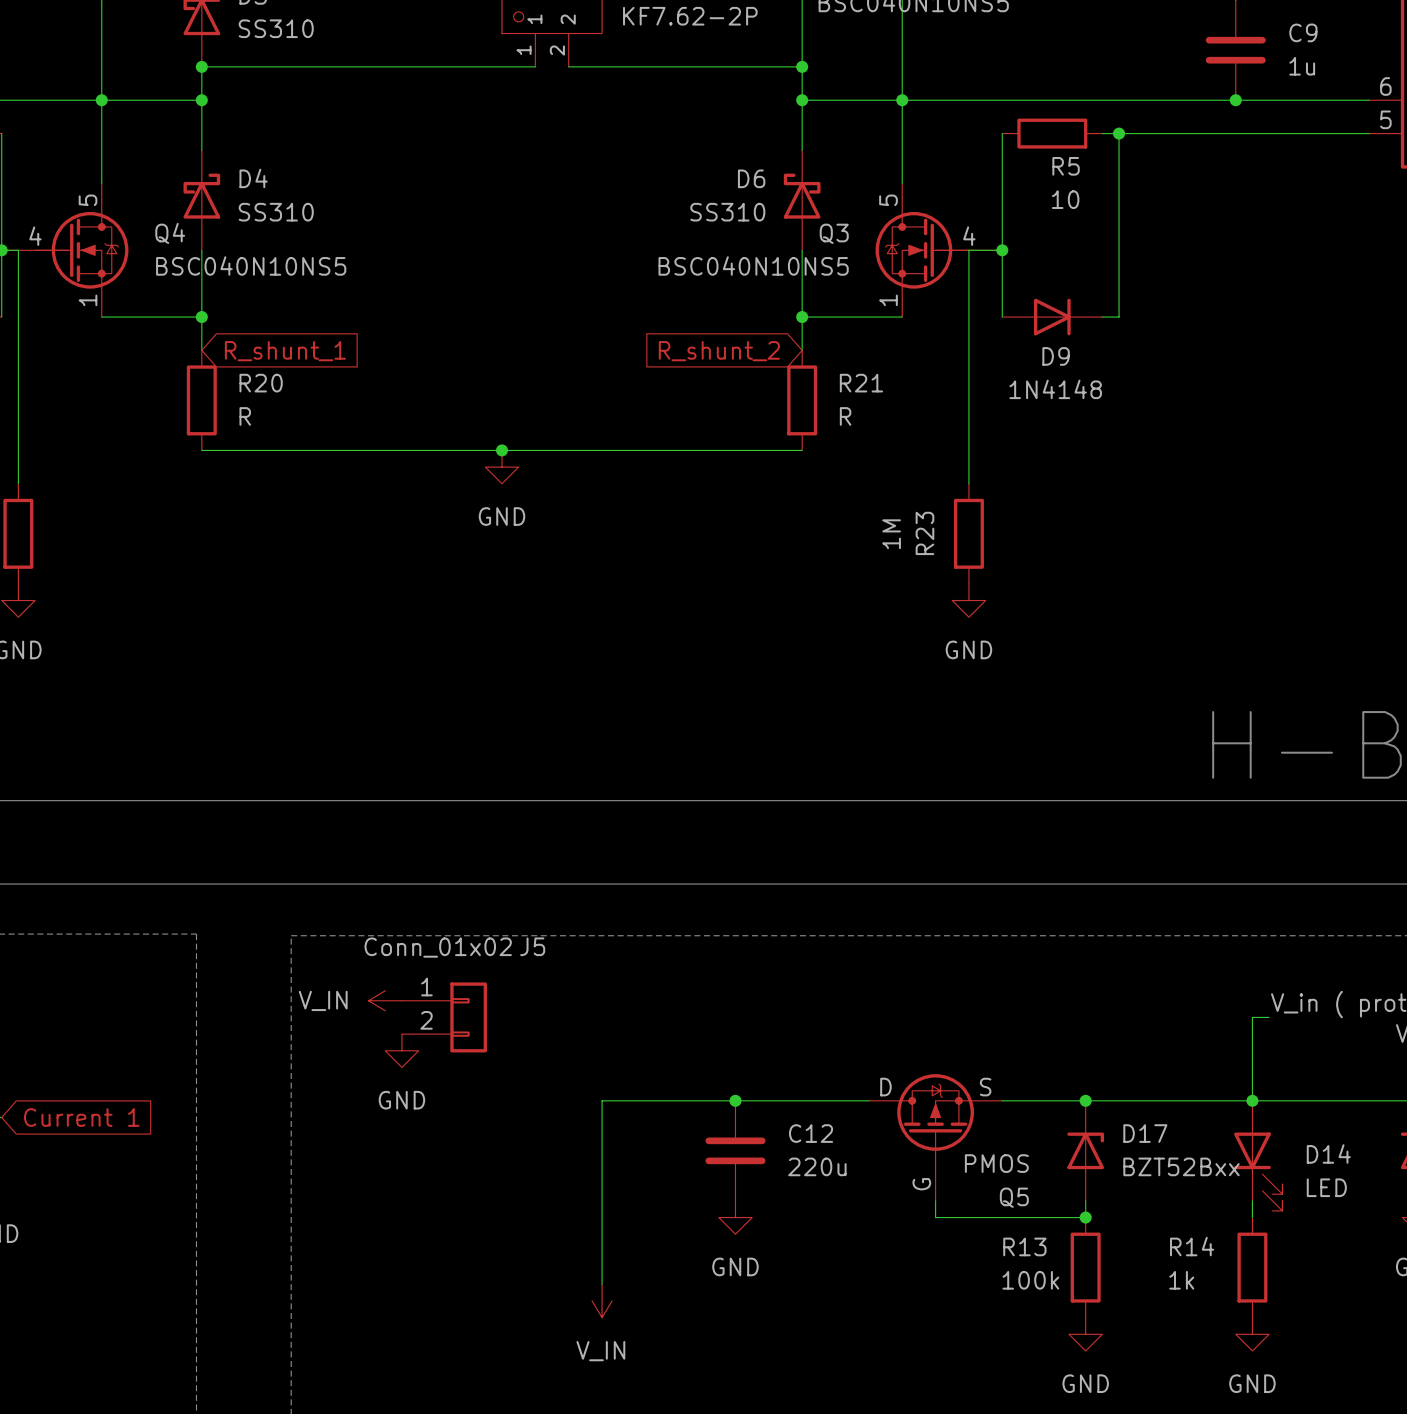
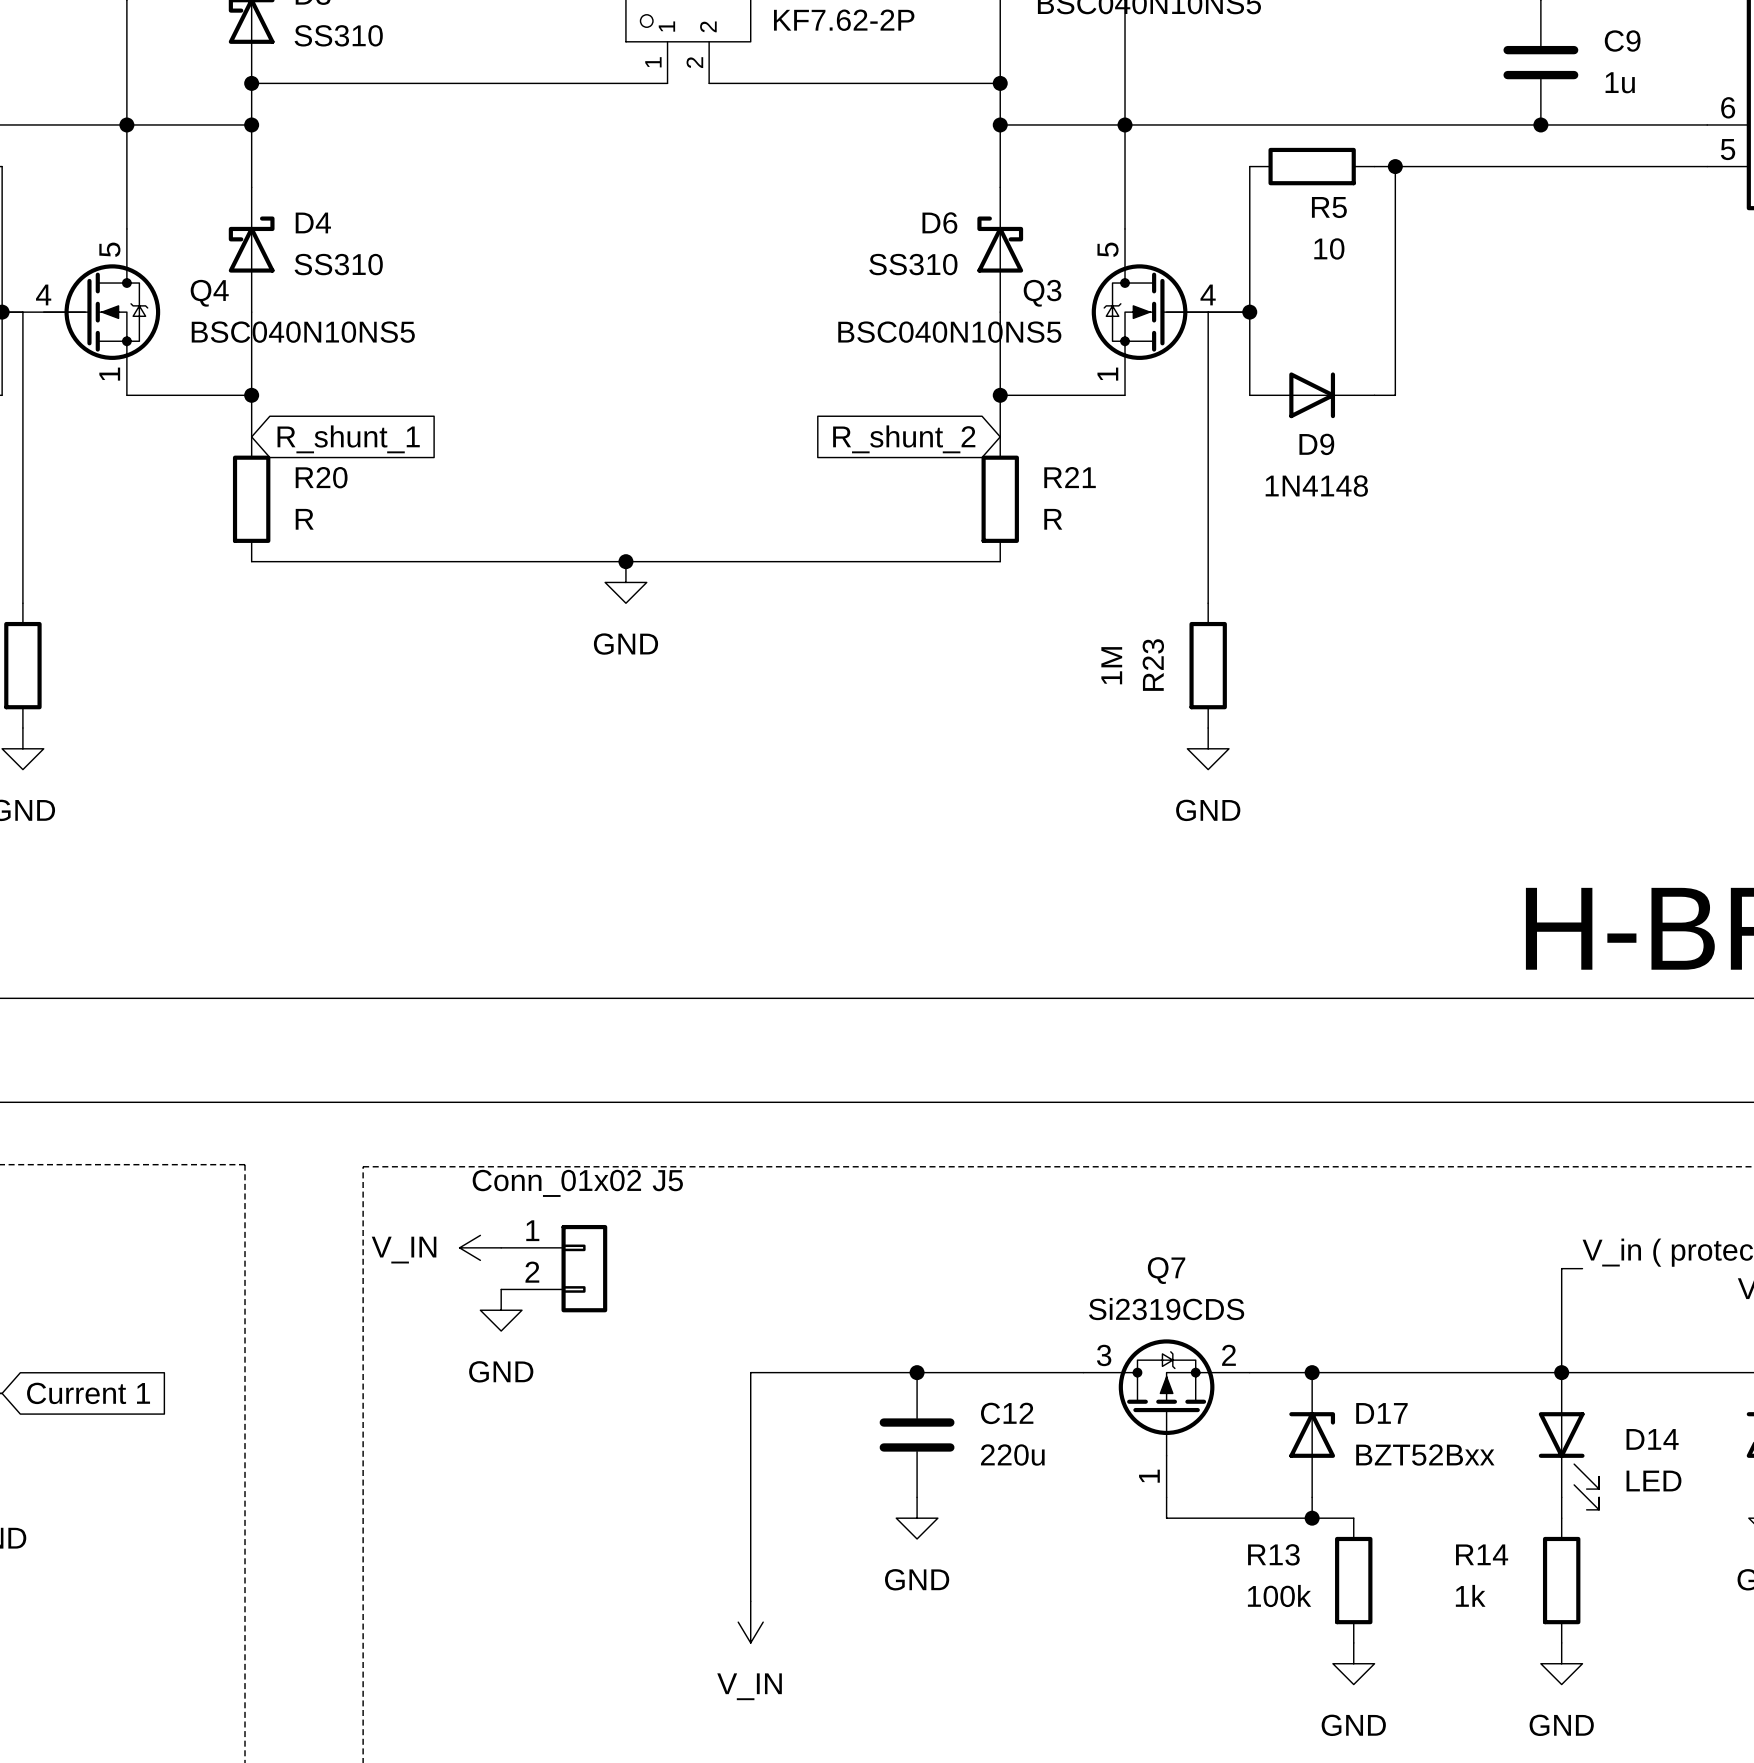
Q5 pin name: D (885, 1087) -> none
Q5 pin number: none -> 3 (1104, 1355)
Q5 pin name: S (985, 1087) -> none
Q5 pin number: none -> 2 (1228, 1355)
junction position: (1085, 1100) -> (1312, 1372)
D17 position: (1085, 1150) -> (1312, 1435)
Q5 value: PMOS (996, 1163) -> Si2319CDS (1166, 1309)
Q5 pin name: G (921, 1184) -> none
Q5 pin number: none -> 1 (1149, 1476)
Q5 name: Q5 (1014, 1197) -> Q7 (1166, 1270)
wire: (1085, 1200) (1085, 1217) -> (1312, 1497) (1312, 1518)
junction position: (1085, 1217) -> (1312, 1518)

